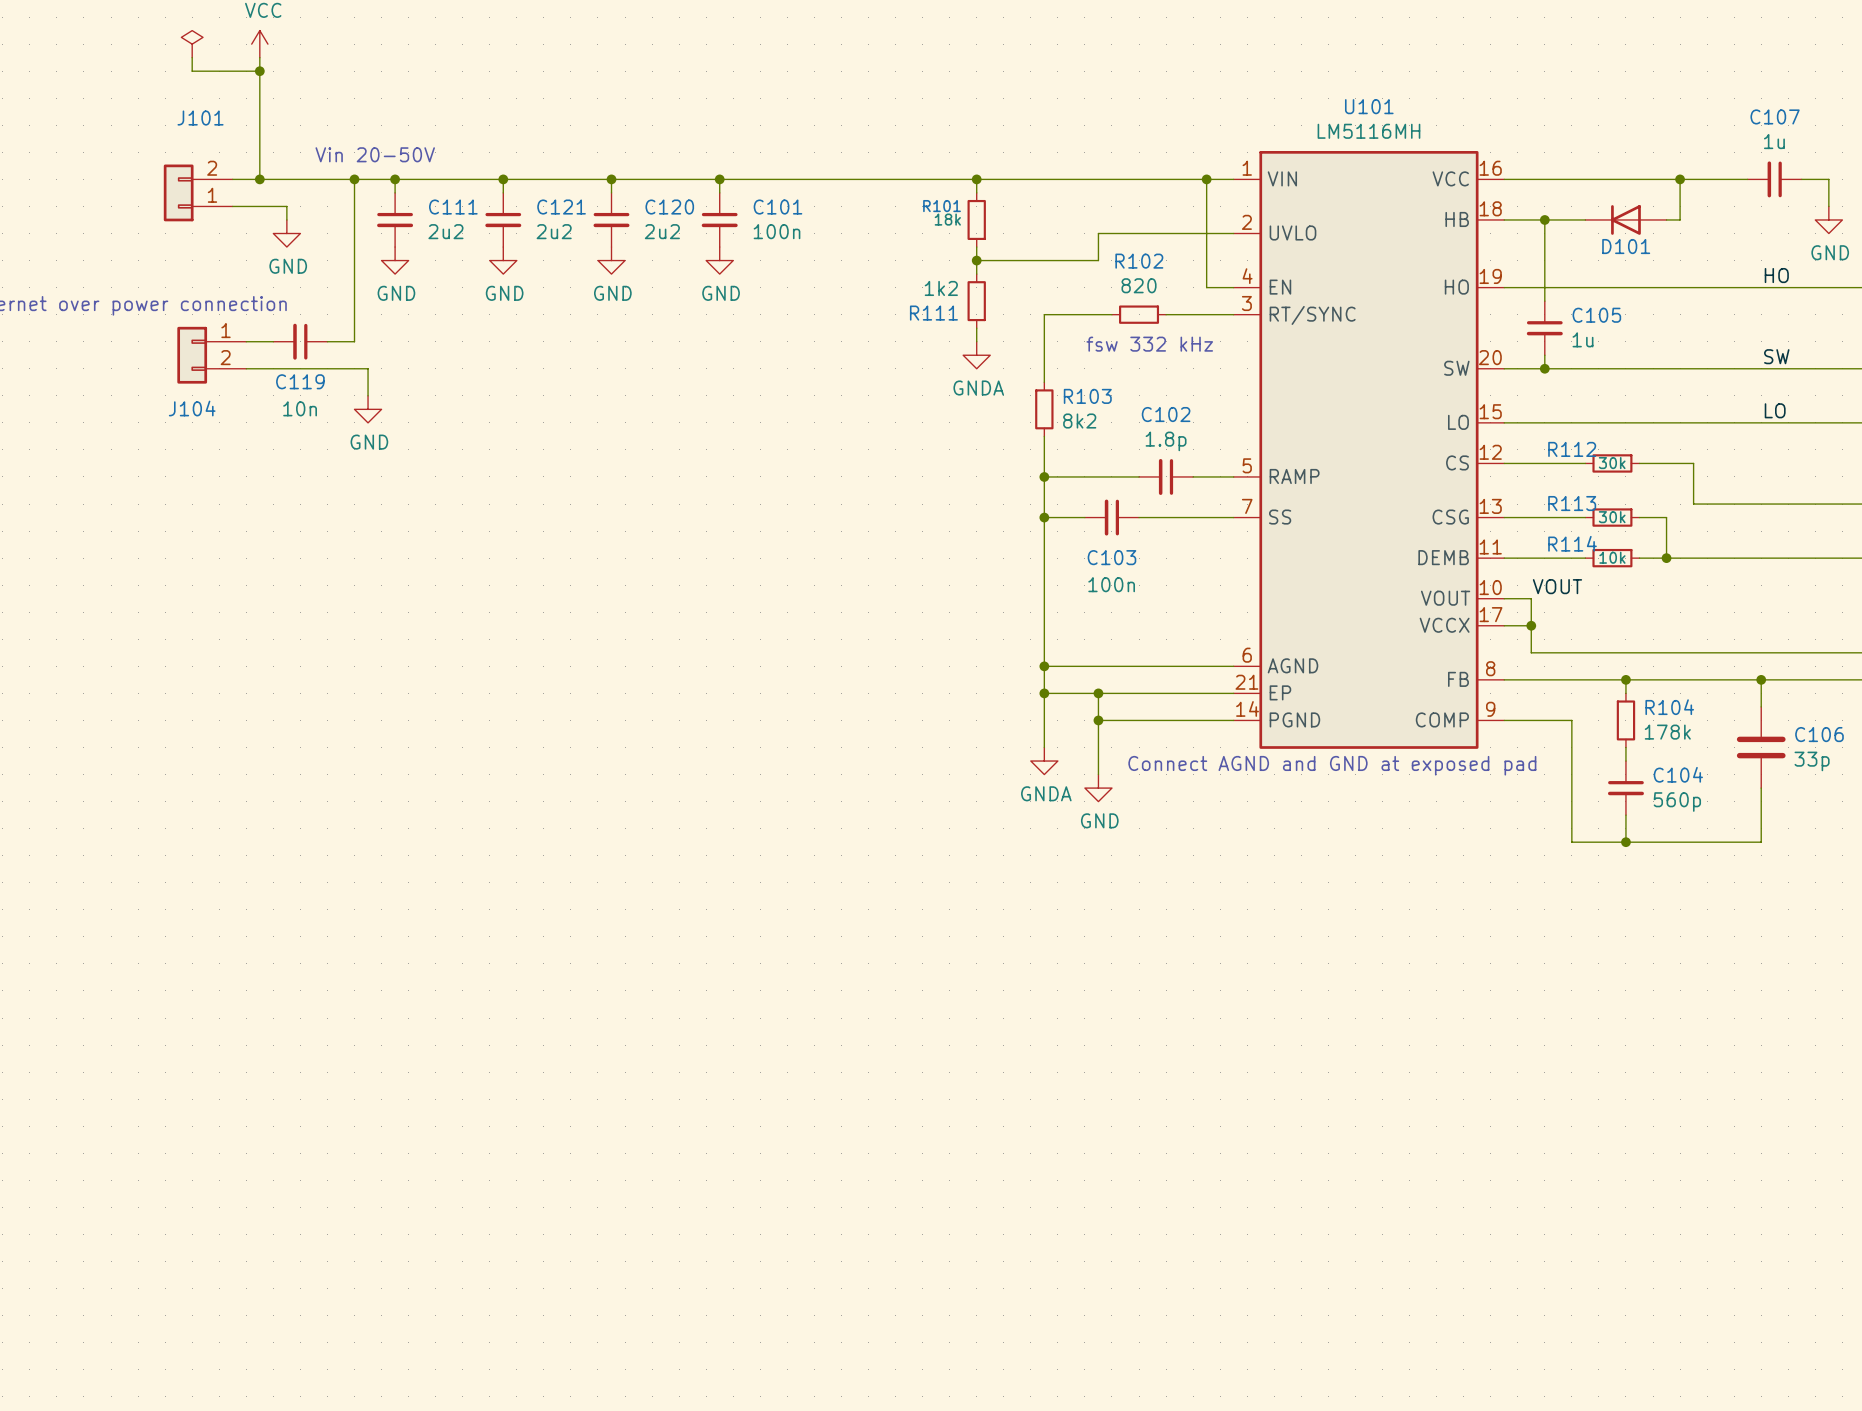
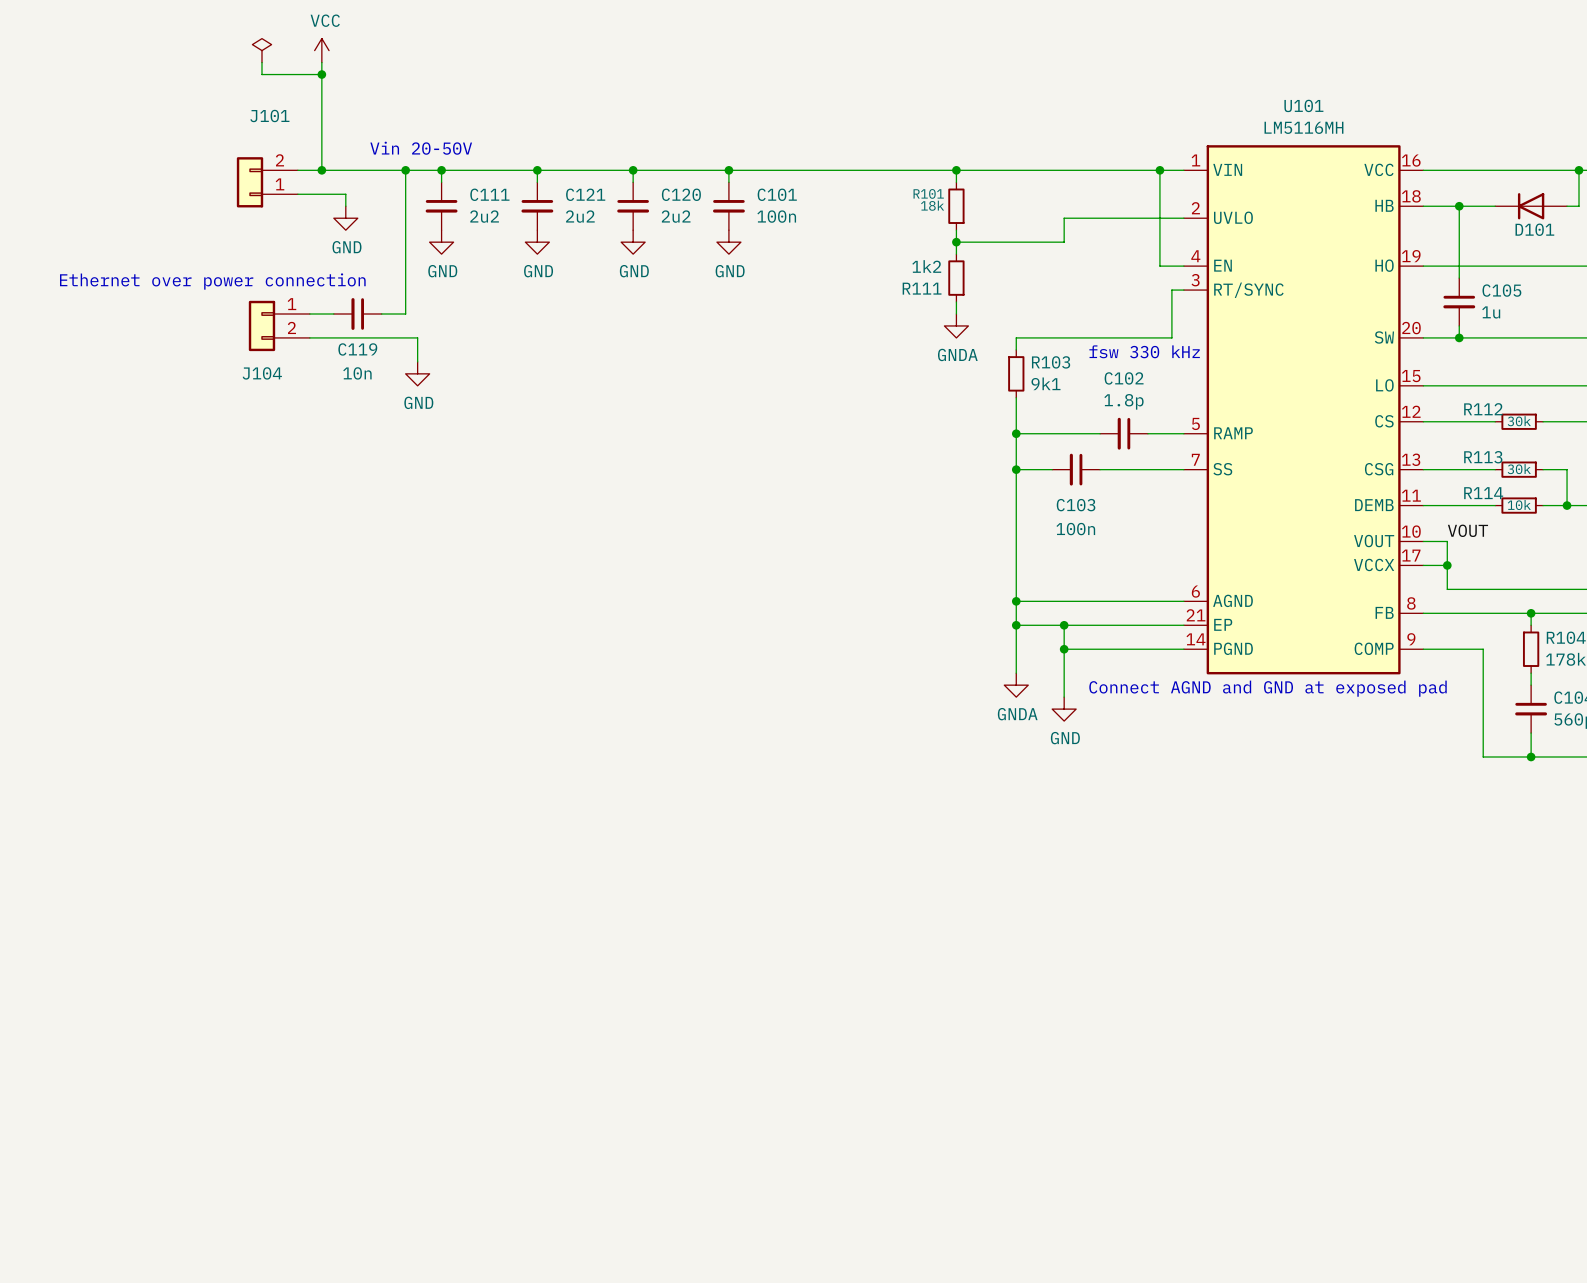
wire: (1111, 314) (1044, 314) (1044, 368) -> (1171, 290) (1171, 337) (1016, 337)
R102: 820 (1139, 314) -> none
wire: (1166, 314) (1220, 314) -> none
text: fsw 332 kHz (1149, 344) -> none
text: none -> fsw 330 kHz (1144, 351)
R103 value: 8k2 (1079, 421) -> 9k1 (1045, 383)

